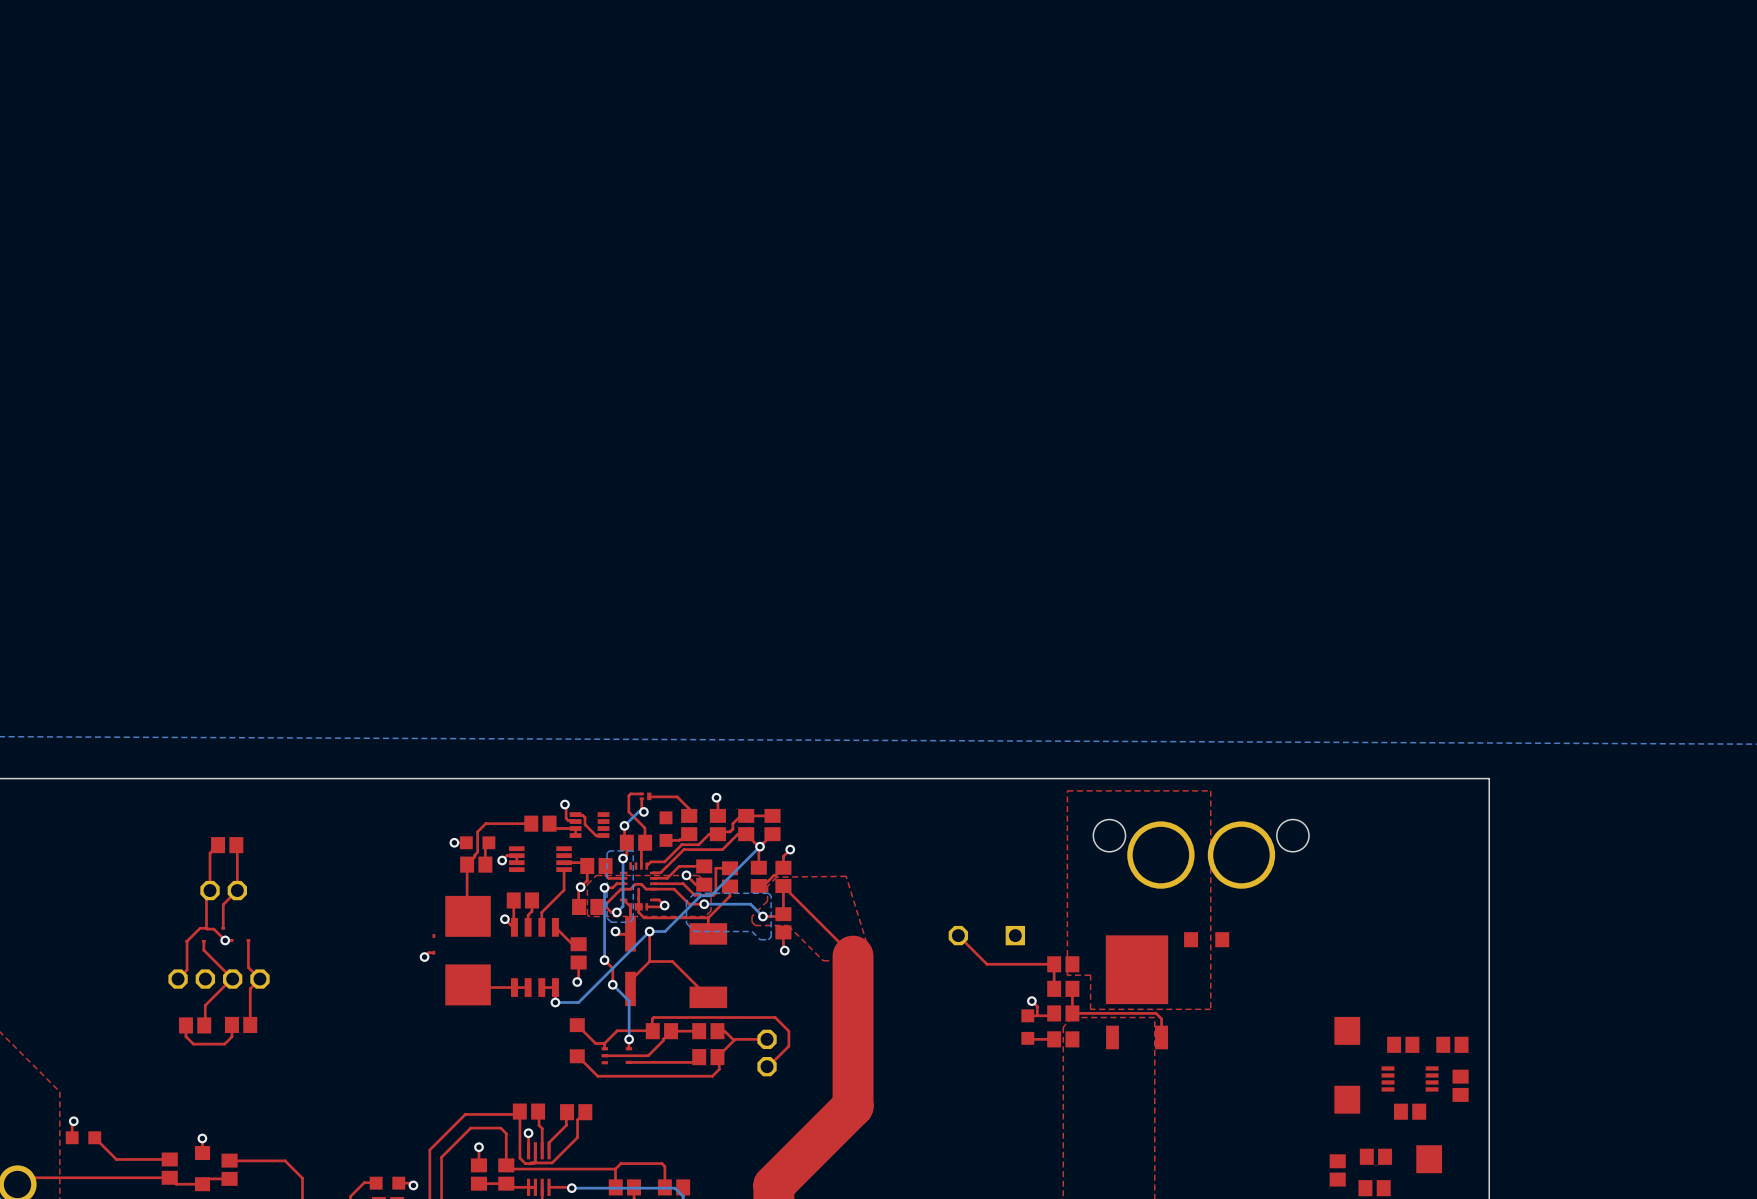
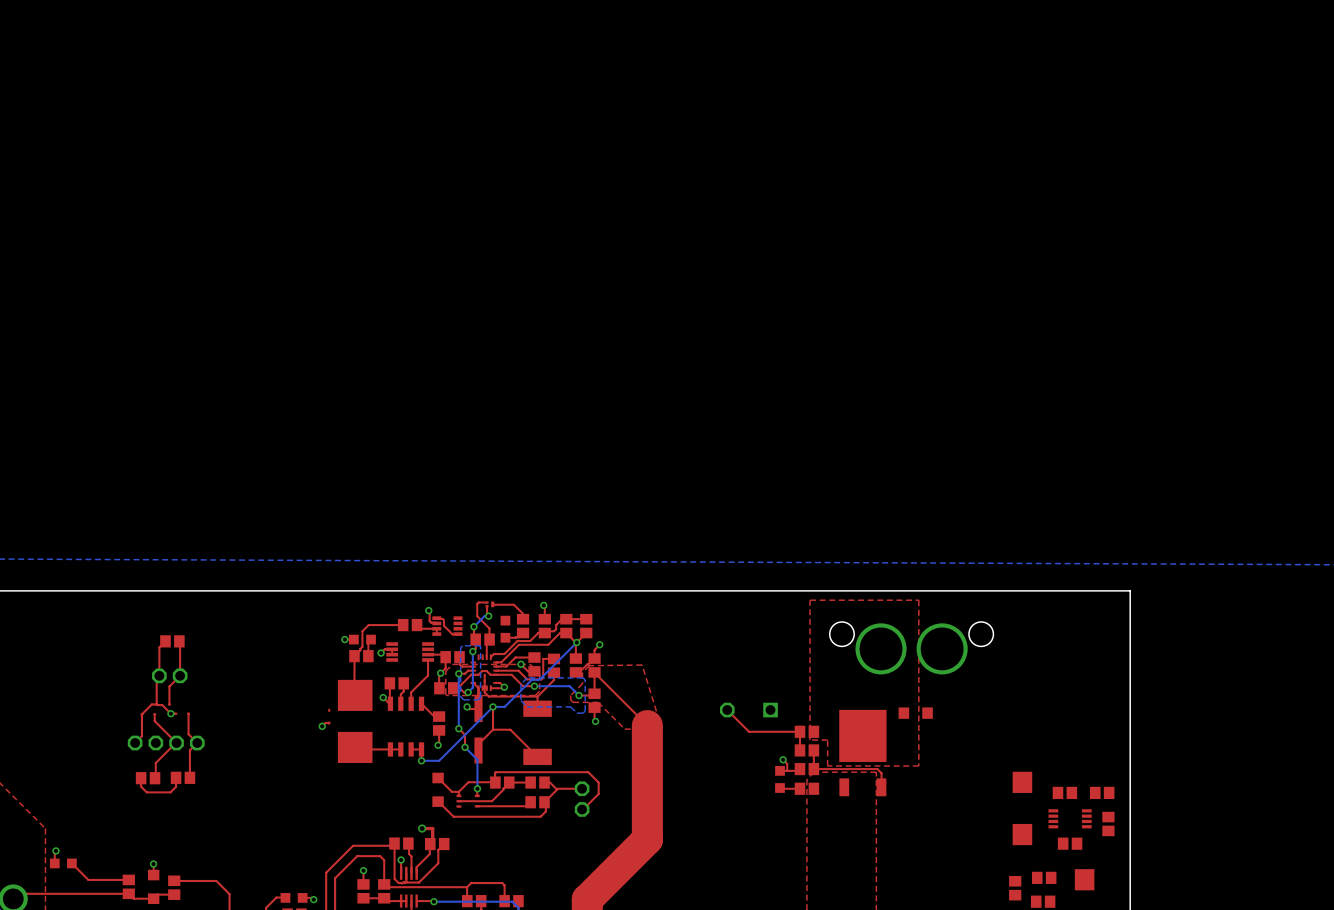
top track: none -> (422, 828) (432, 828) (432, 841) (430, 844)
via: none -> (422, 828)

